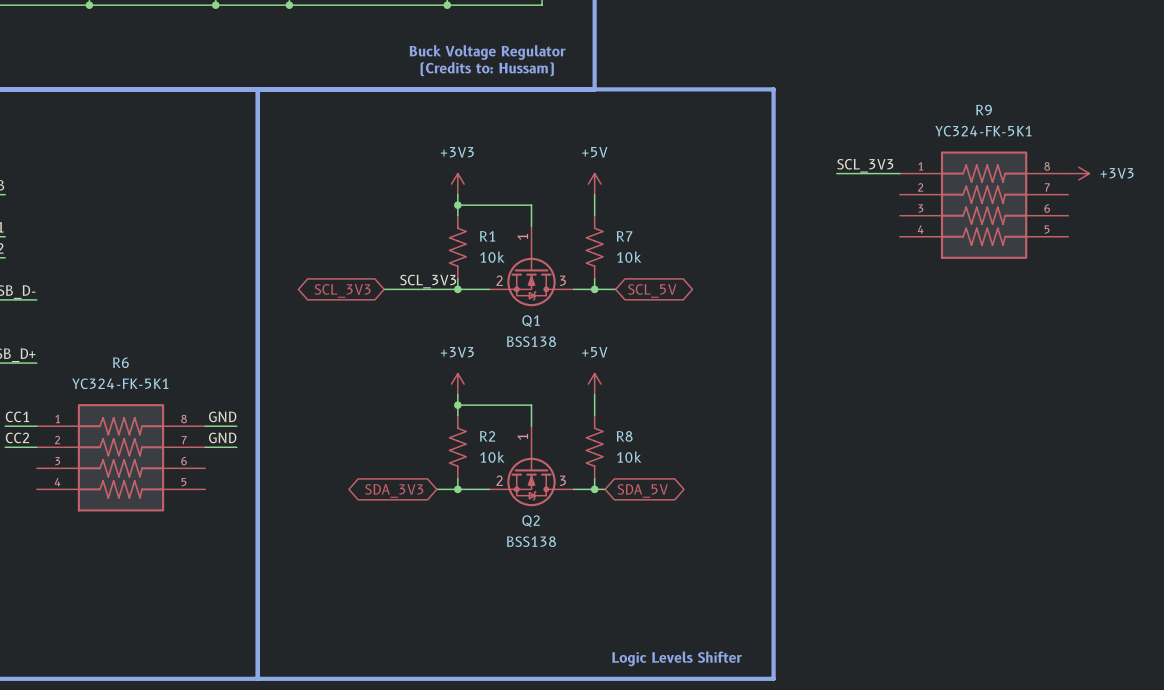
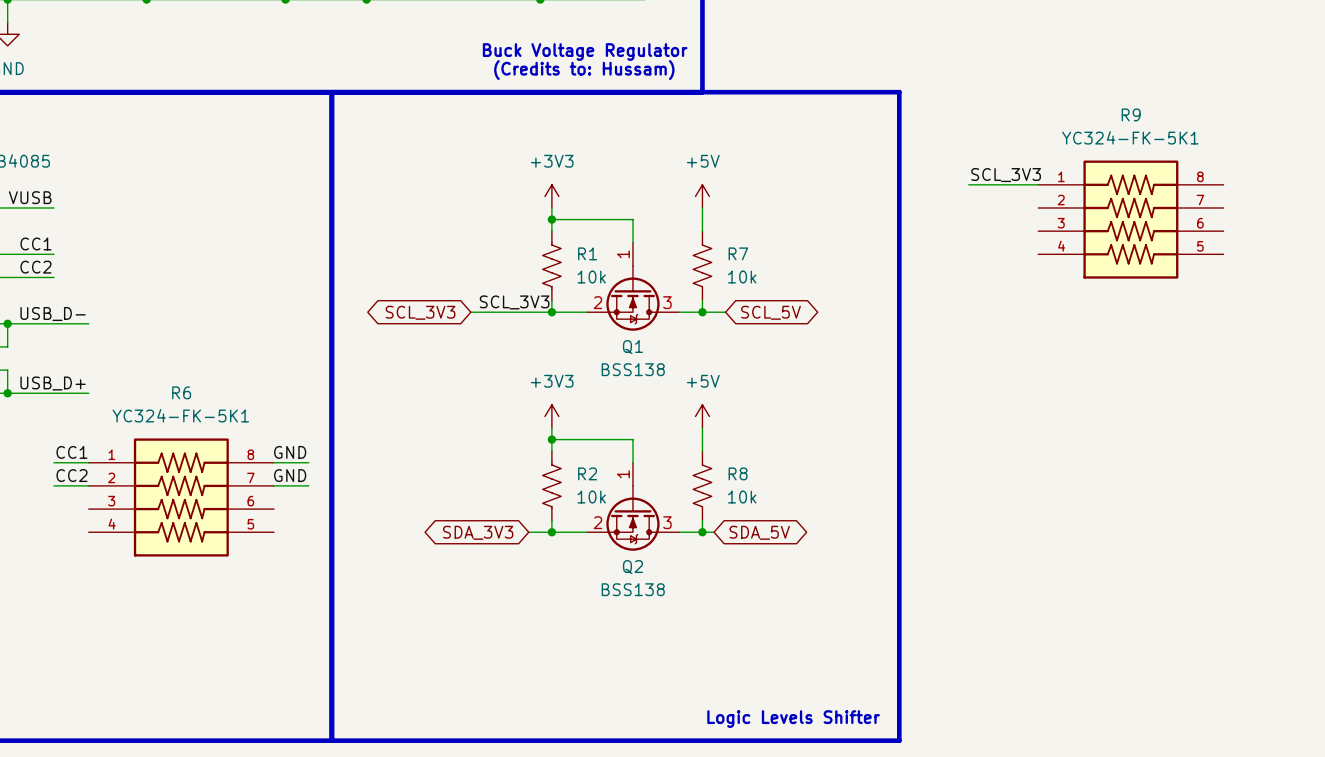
power symbol: +3V3 (1078, 173) -> none

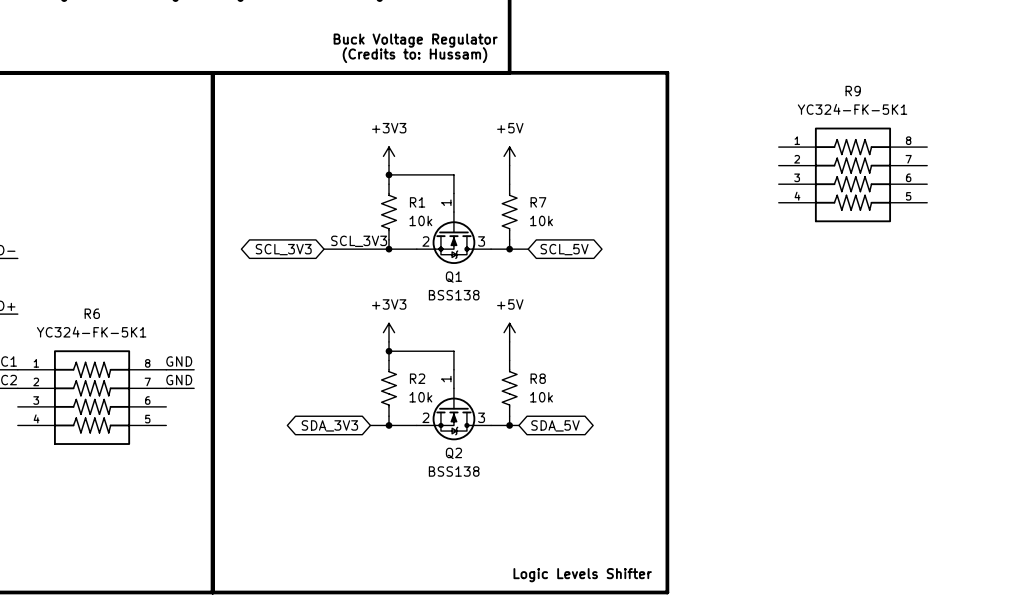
label: SCL_3V3 (1006, 175) -> none
wire: (968, 184) (1038, 184) -> none

